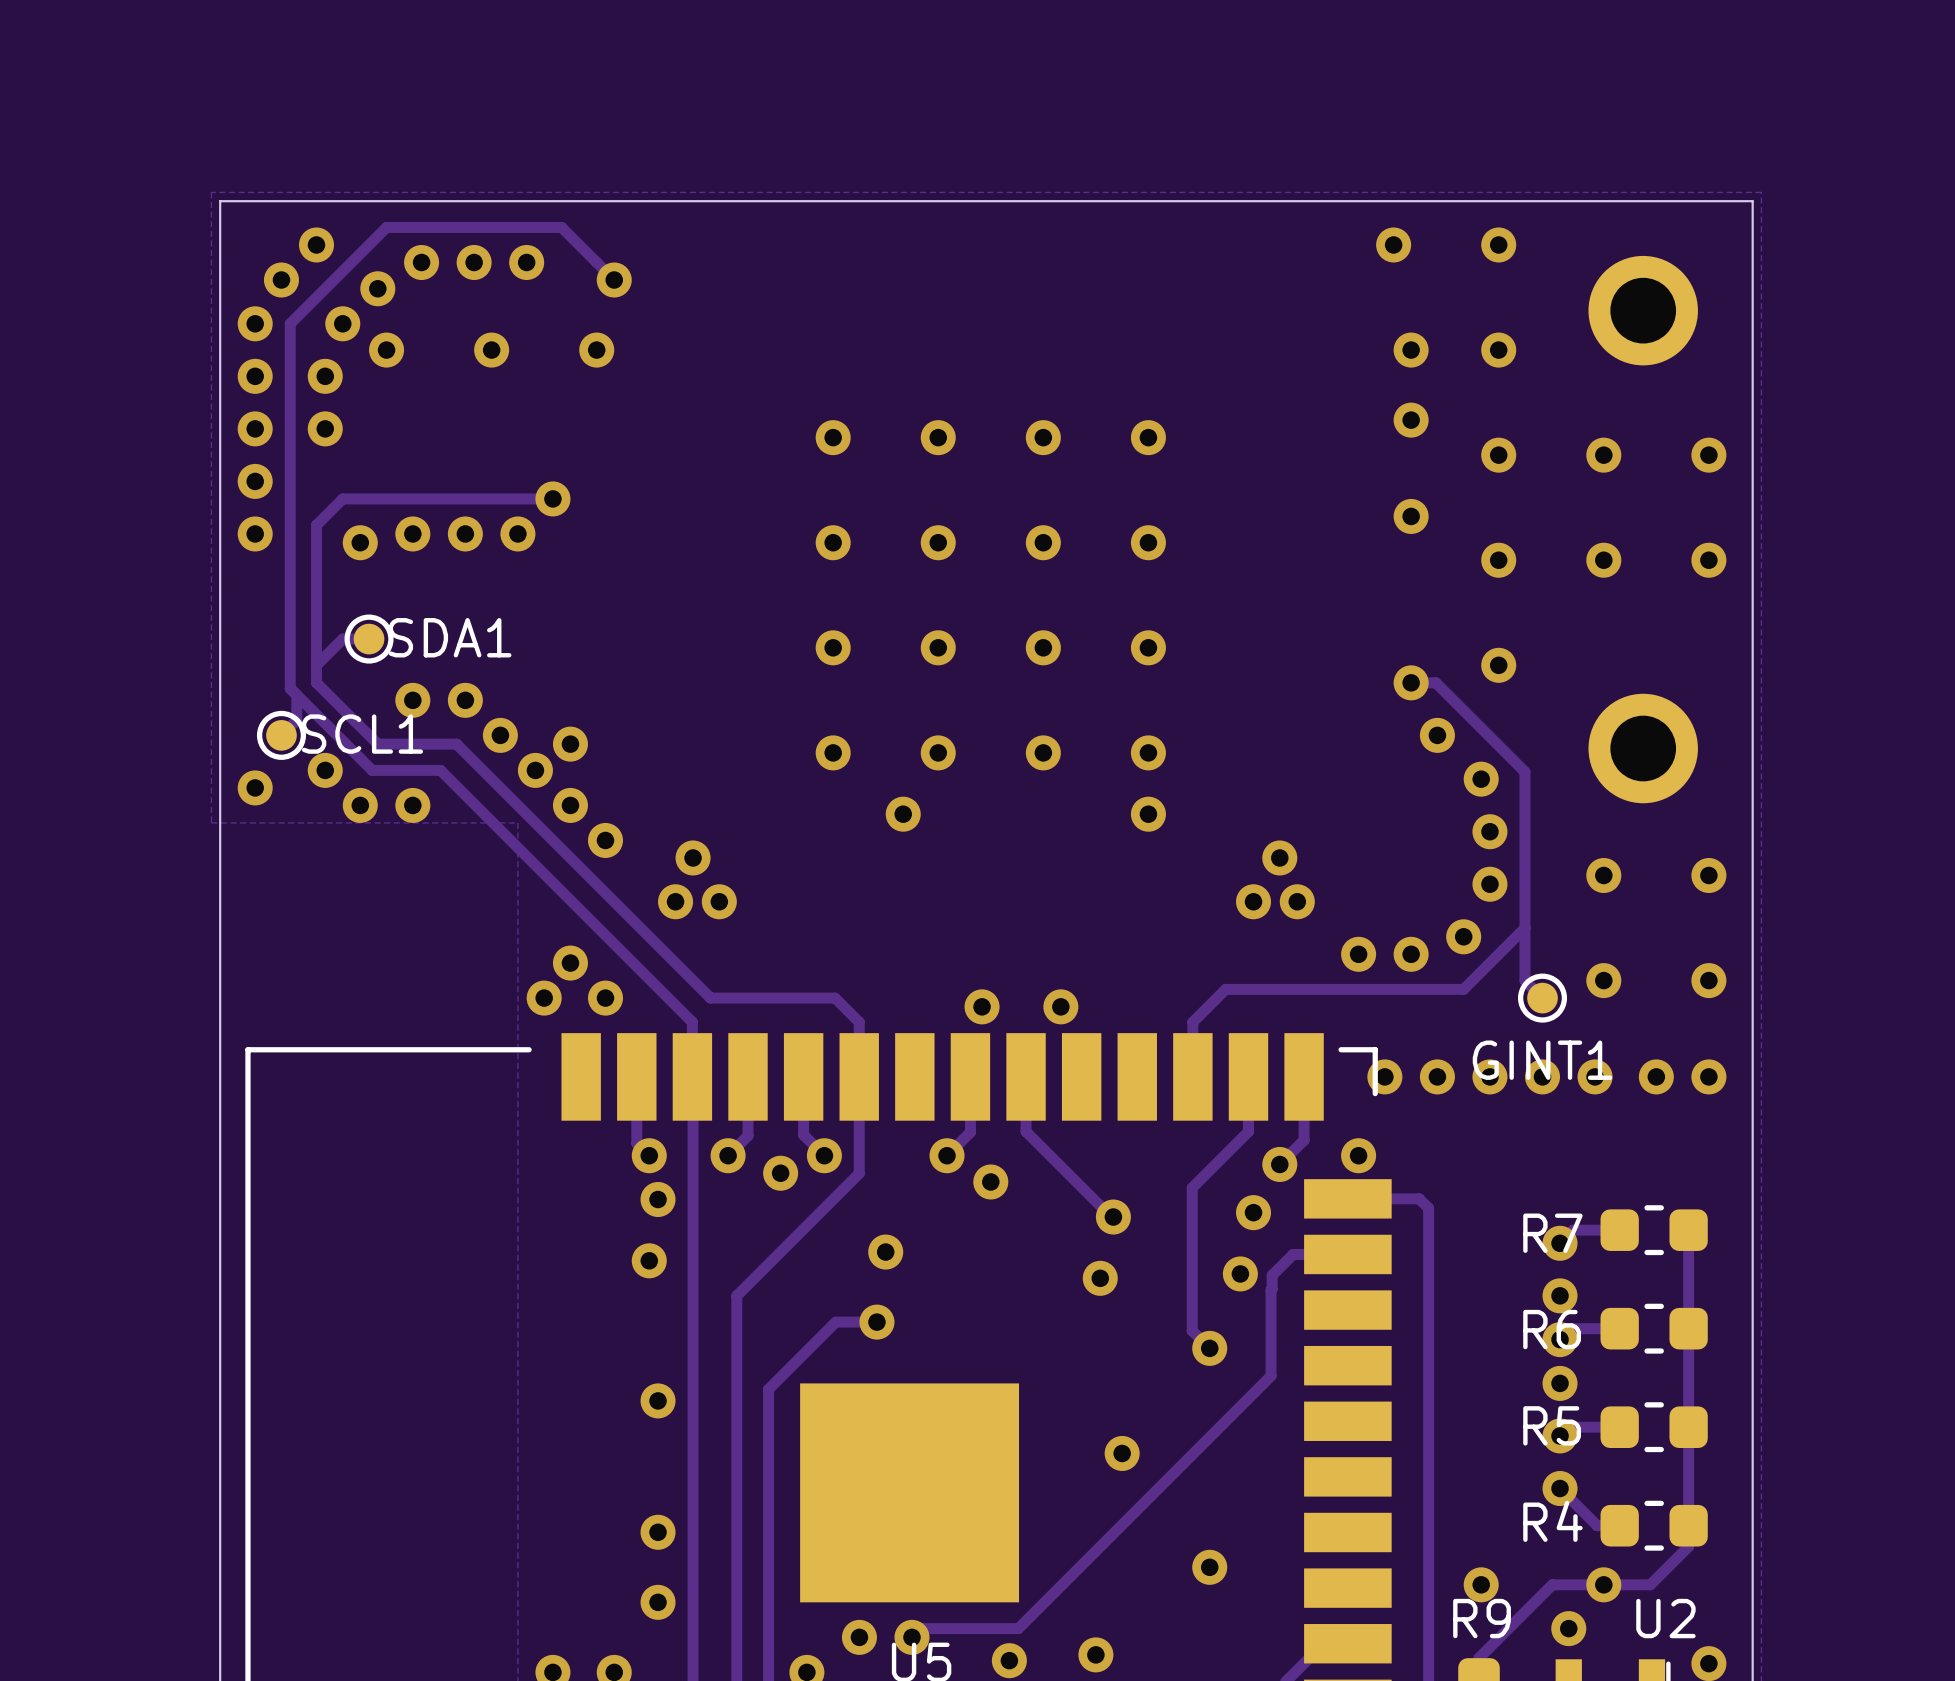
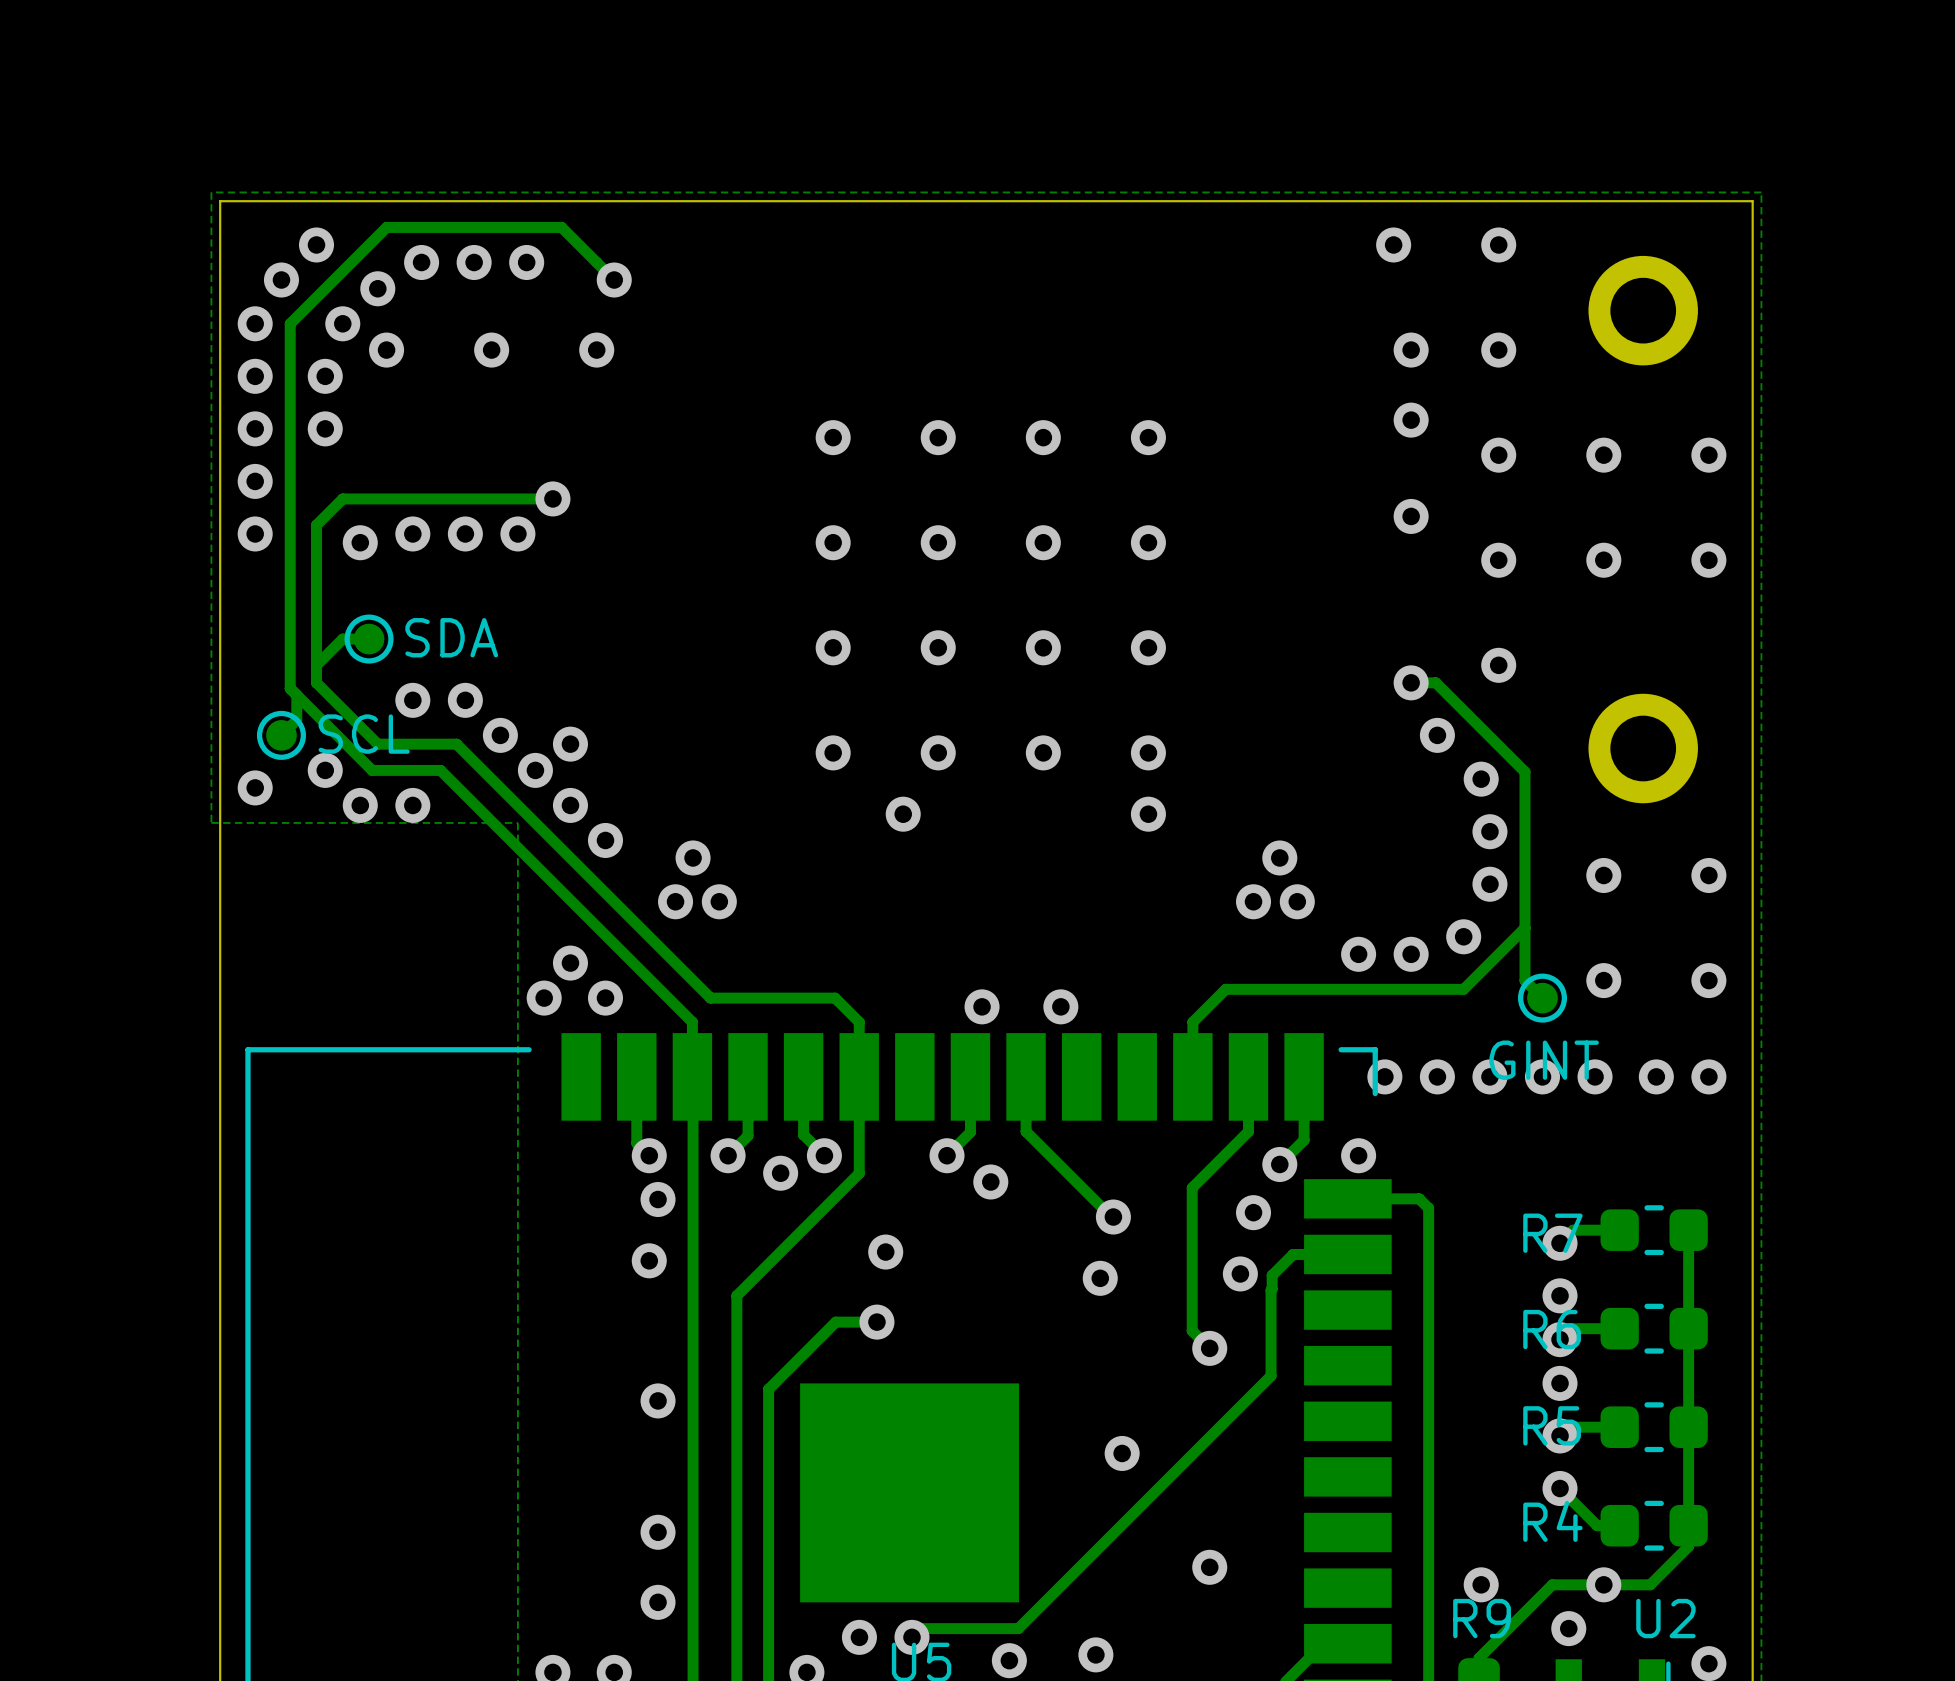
SDA1 name: SDA1 (450, 637) -> SDA (451, 637)
SCL1 name: SCL1 (362, 734) -> SCL (364, 734)
GINT1 name: GINT1 (1542, 1060) -> GINT (1544, 1060)

